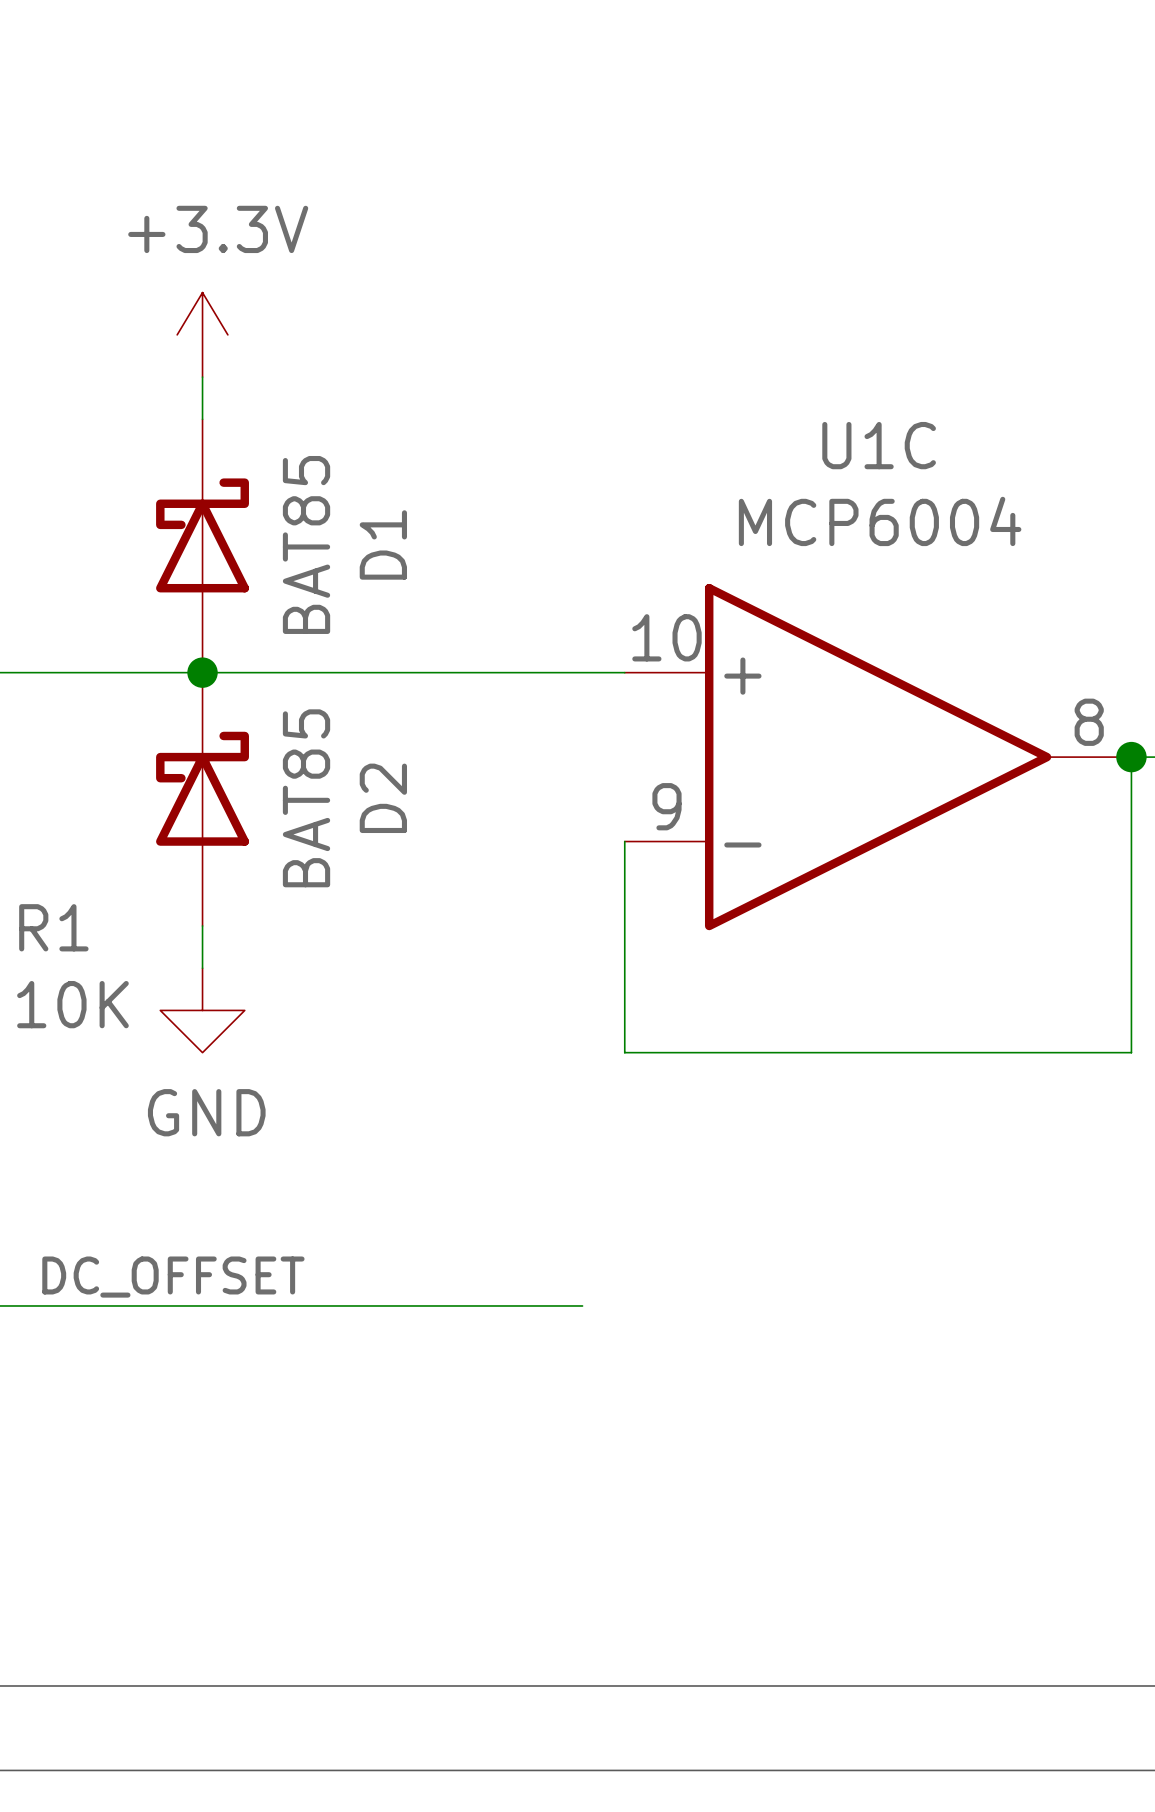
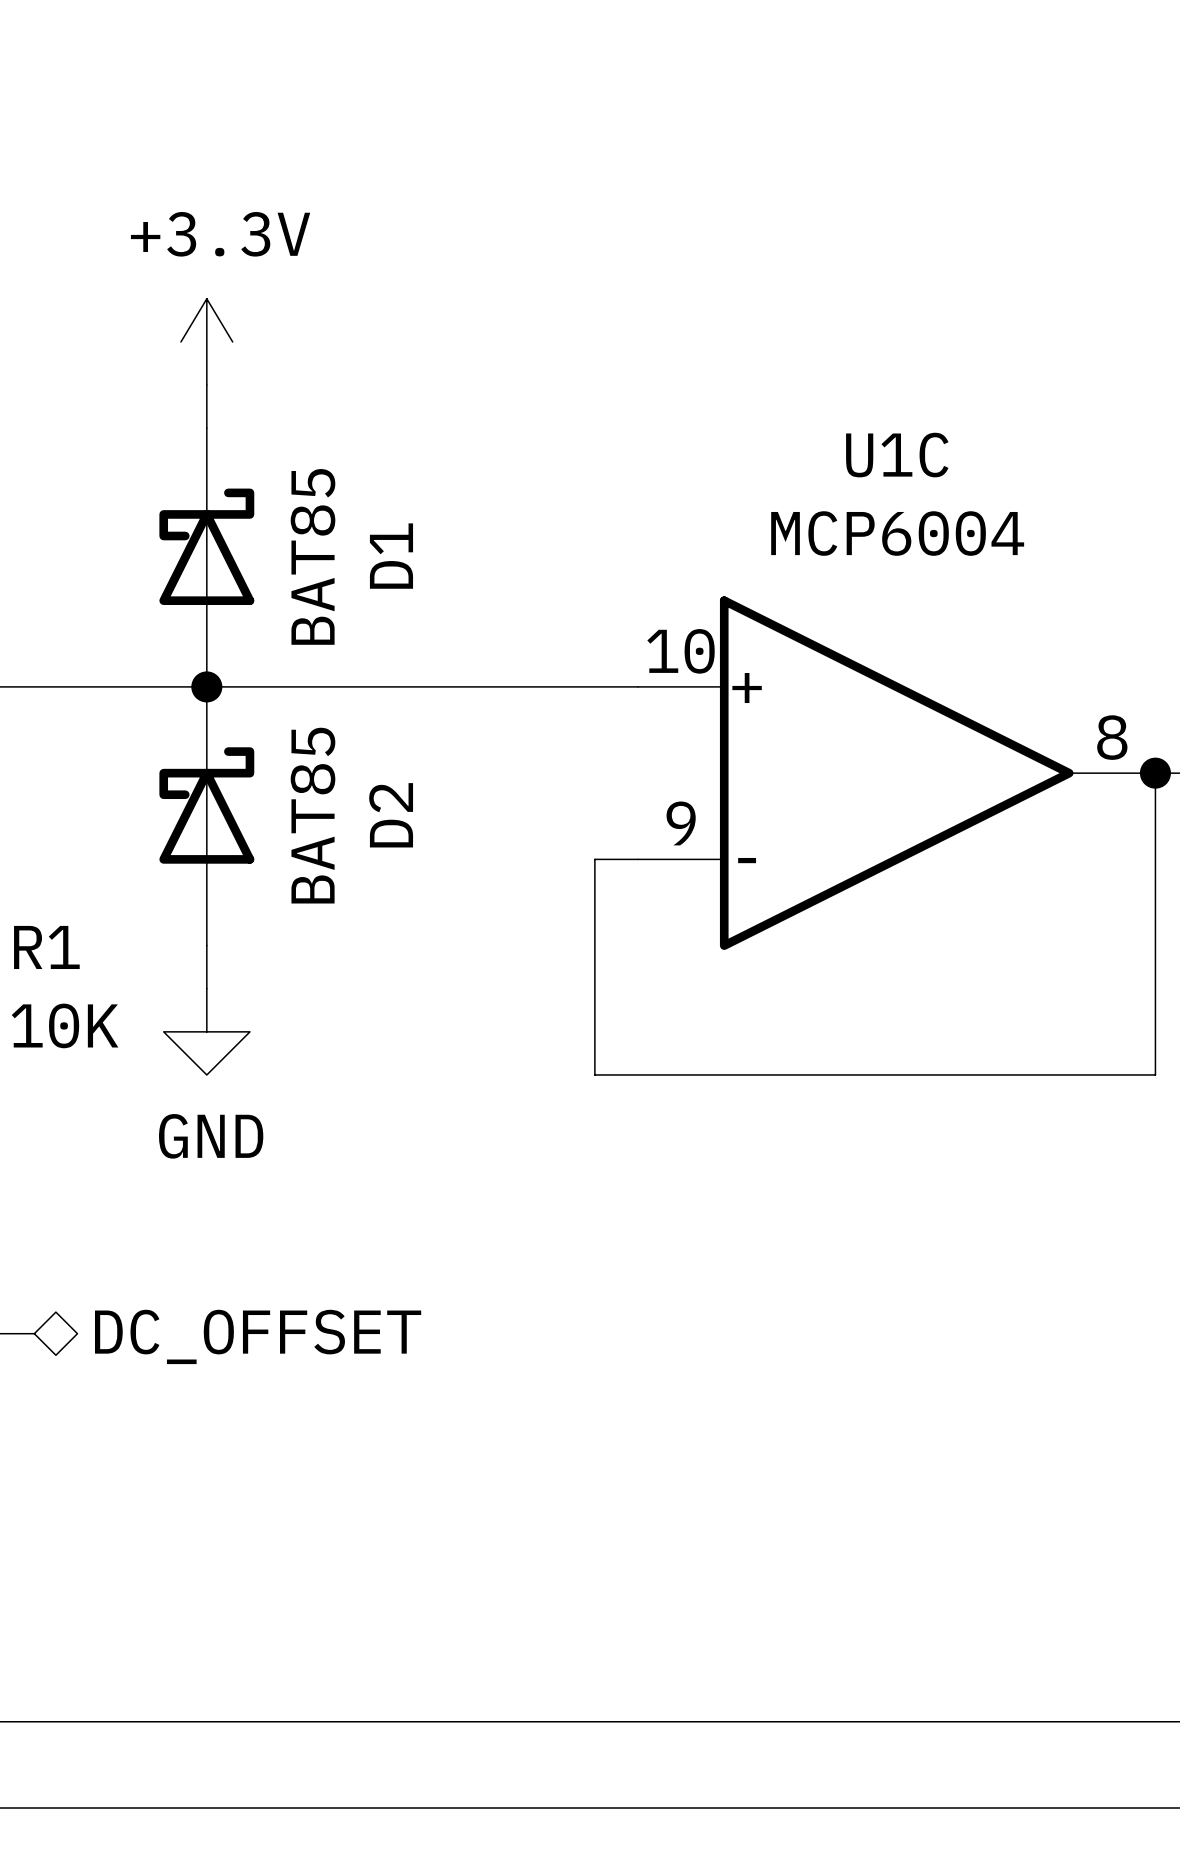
wire: (624, 841) (624, 1052) -> (638, 859) (594, 859) (594, 1074) (638, 1074)
label: DC_OFFSET (173, 1277) -> none
wire: (33, 1305) (582, 1305) -> none
hierarchical label: none -> DC_OFFSET (258, 1336)

